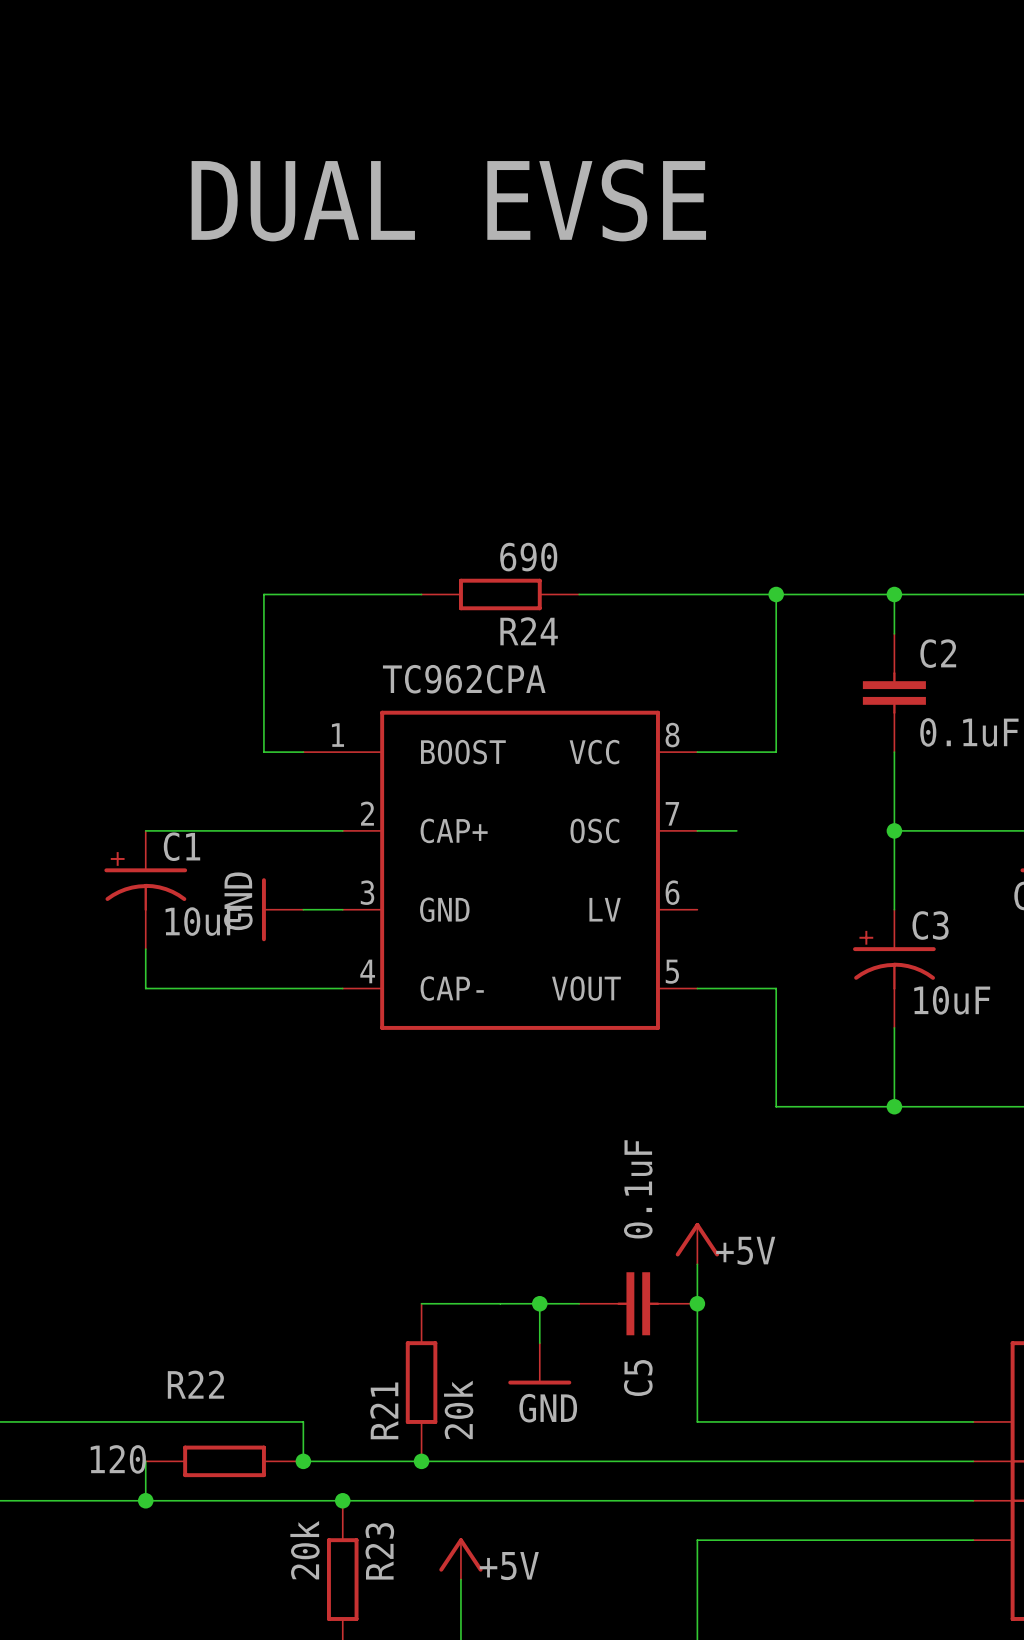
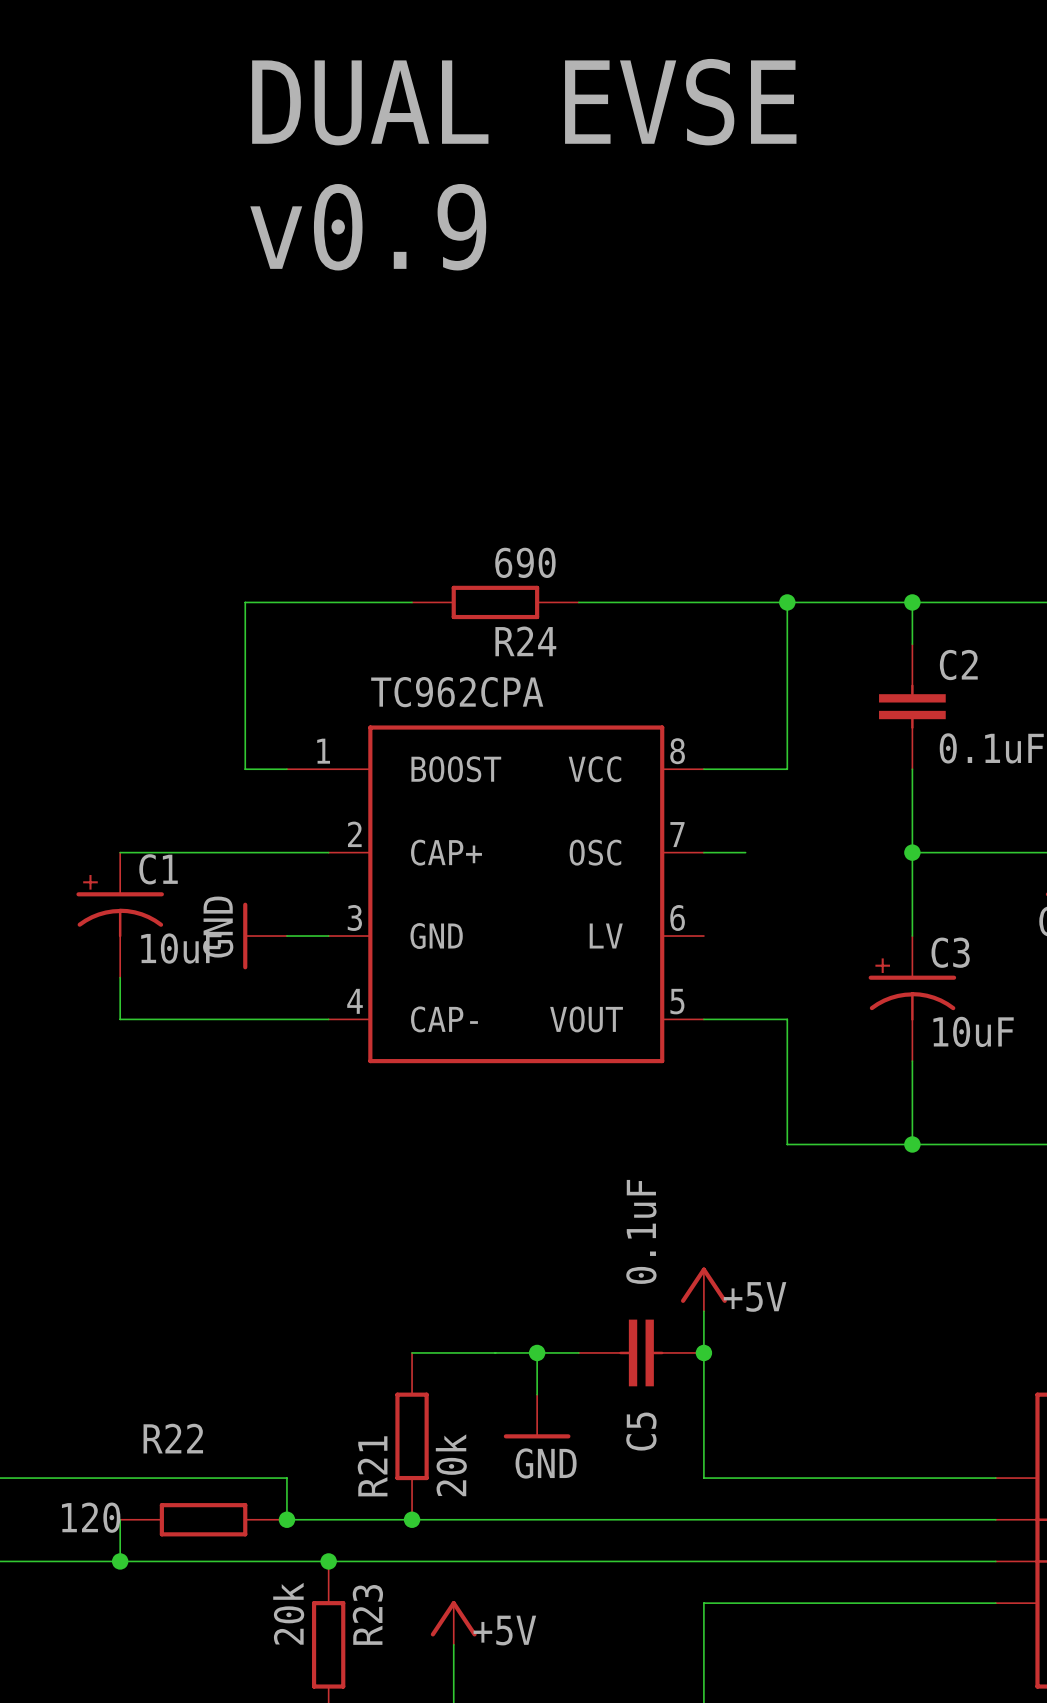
text position: DUAL EVSE (448, 200) -> DUAL EVSE (524, 102)
text: none -> v0.9 (368, 227)

